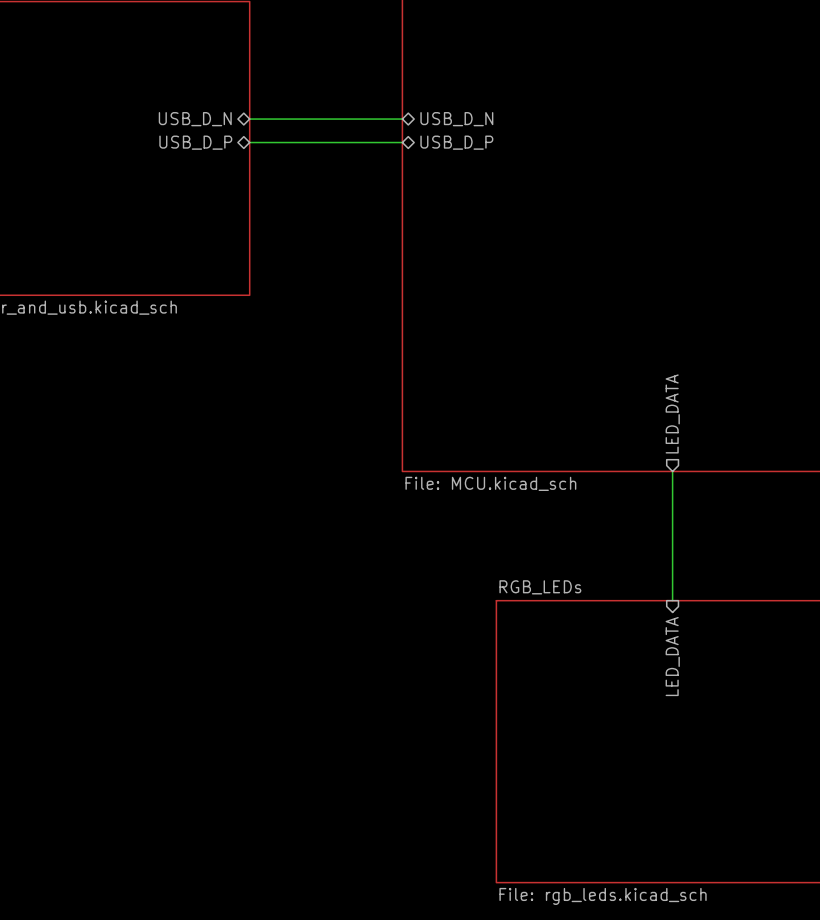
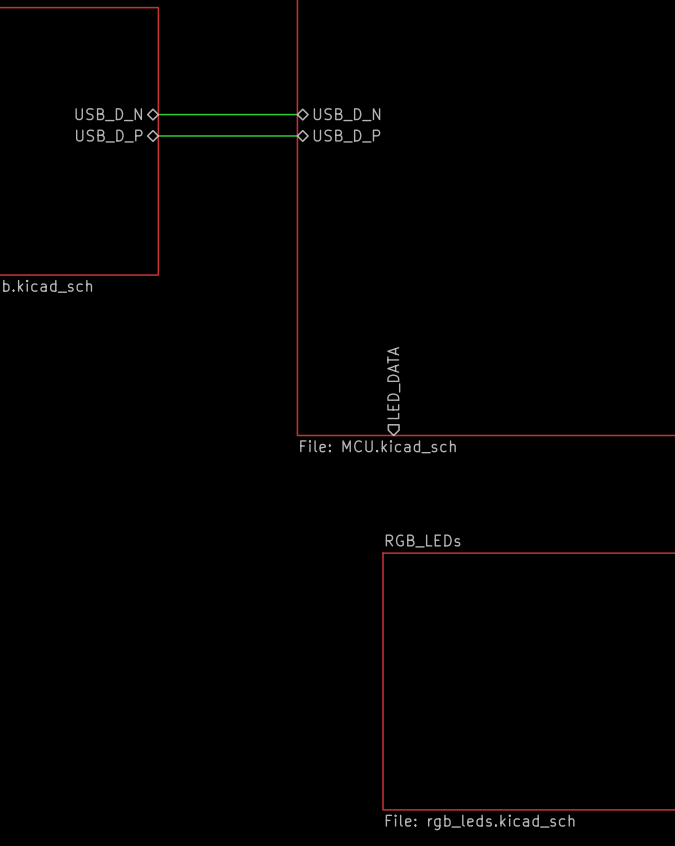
sheet pin: none -> LED_DATA (393, 383)
sheet pin: LED_DATA (672, 413) -> none
wire: (672, 471) (672, 600) -> none
sheet pin: LED_DATA (672, 656) -> none

